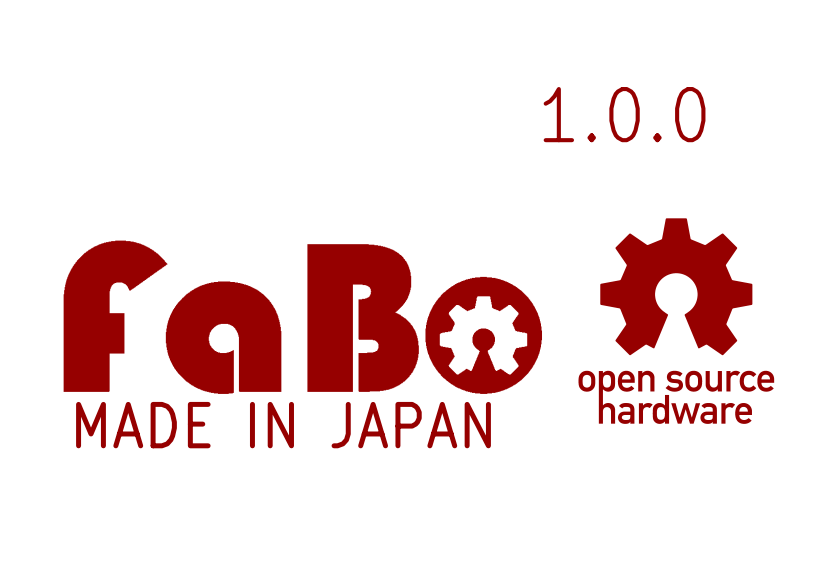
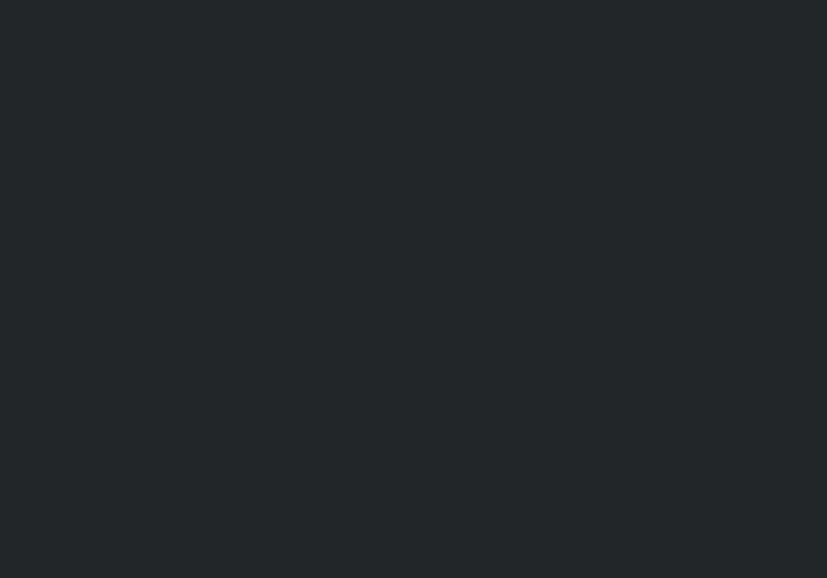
text: 1.0.0 (624, 114) -> none
part: (302, 317) -> none
part: (676, 321) -> none

